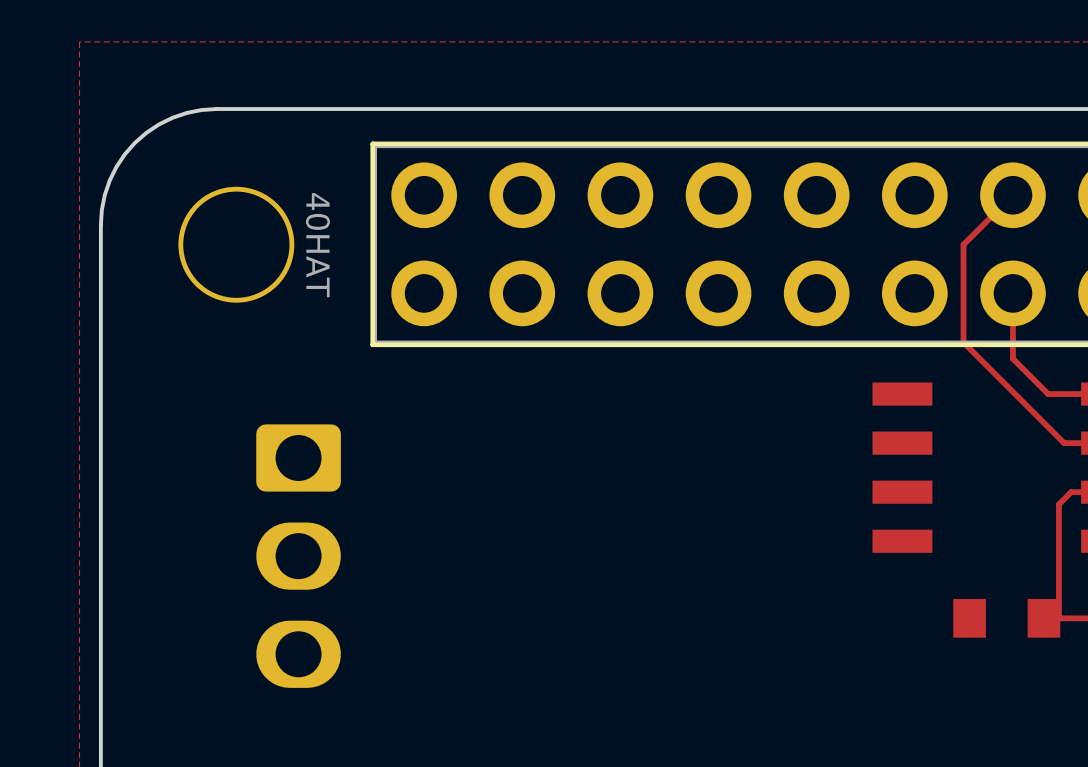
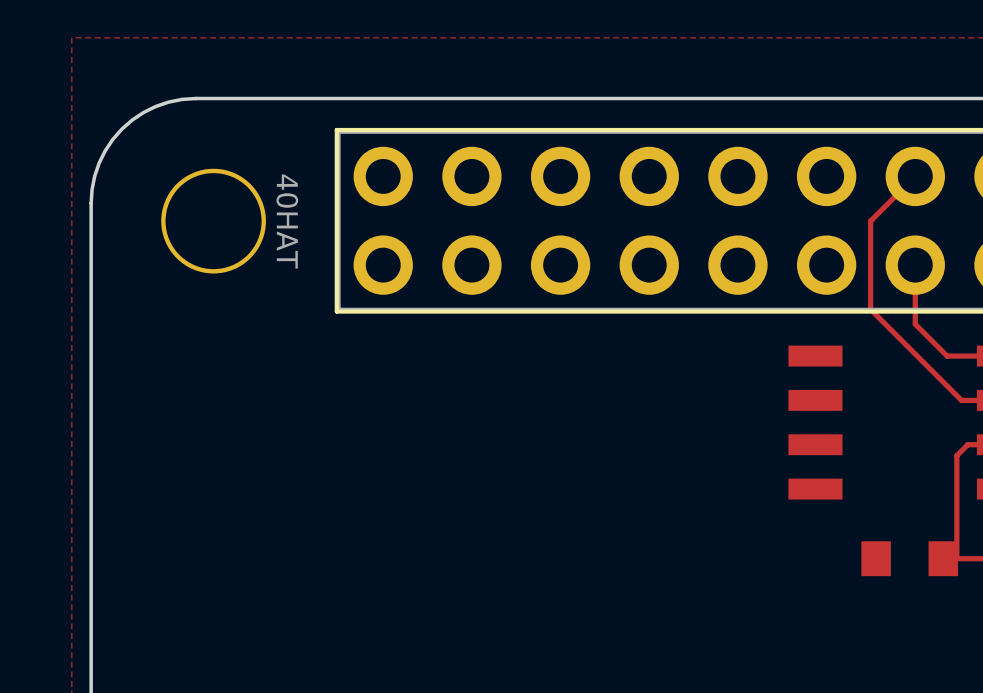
part: (298, 556) -> none

